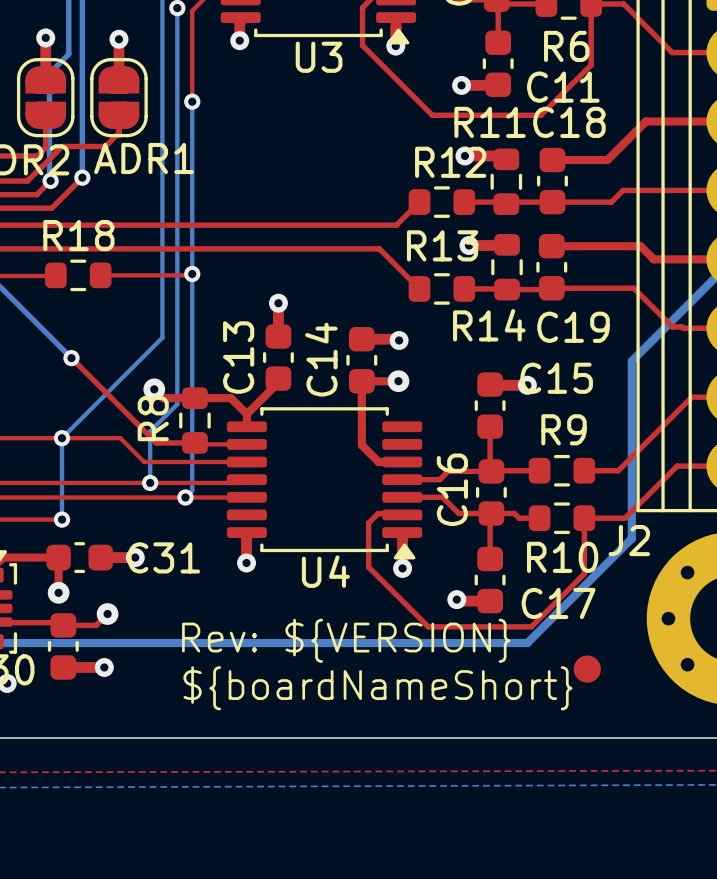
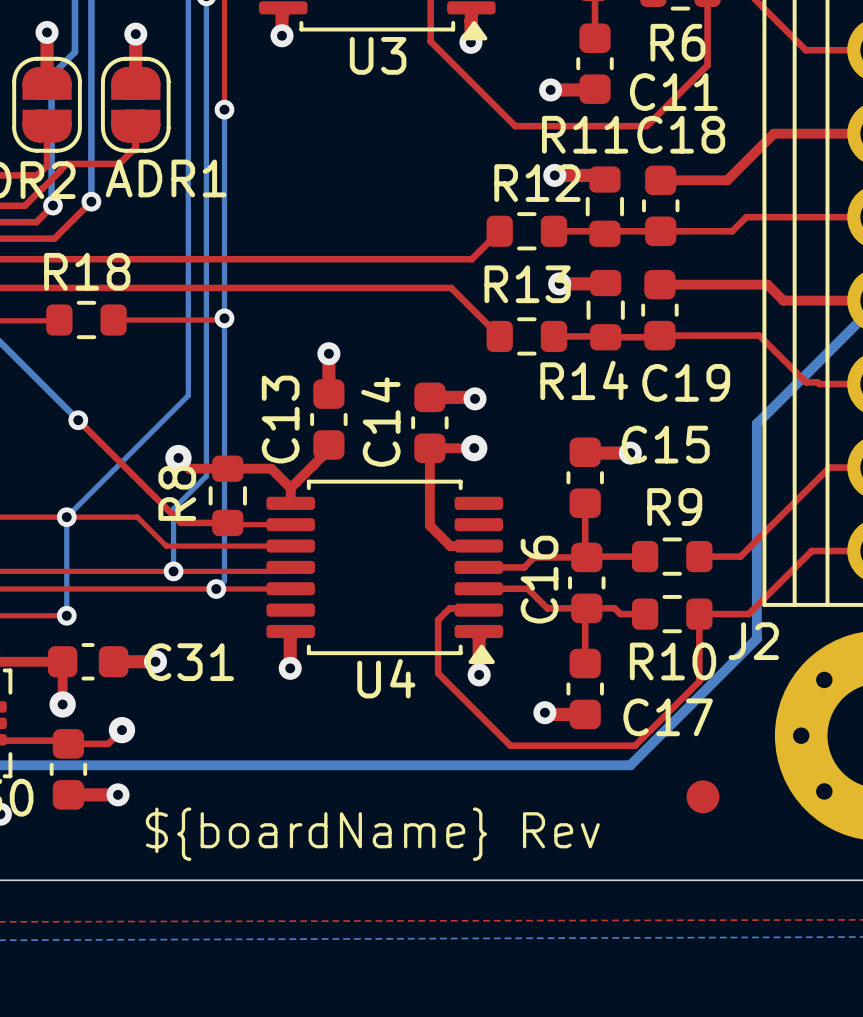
text: Rev: ${VERSION} (346, 640) -> none
text: ${boardNameShort} (378, 688) -> ${boardName} Rev (372, 834)

